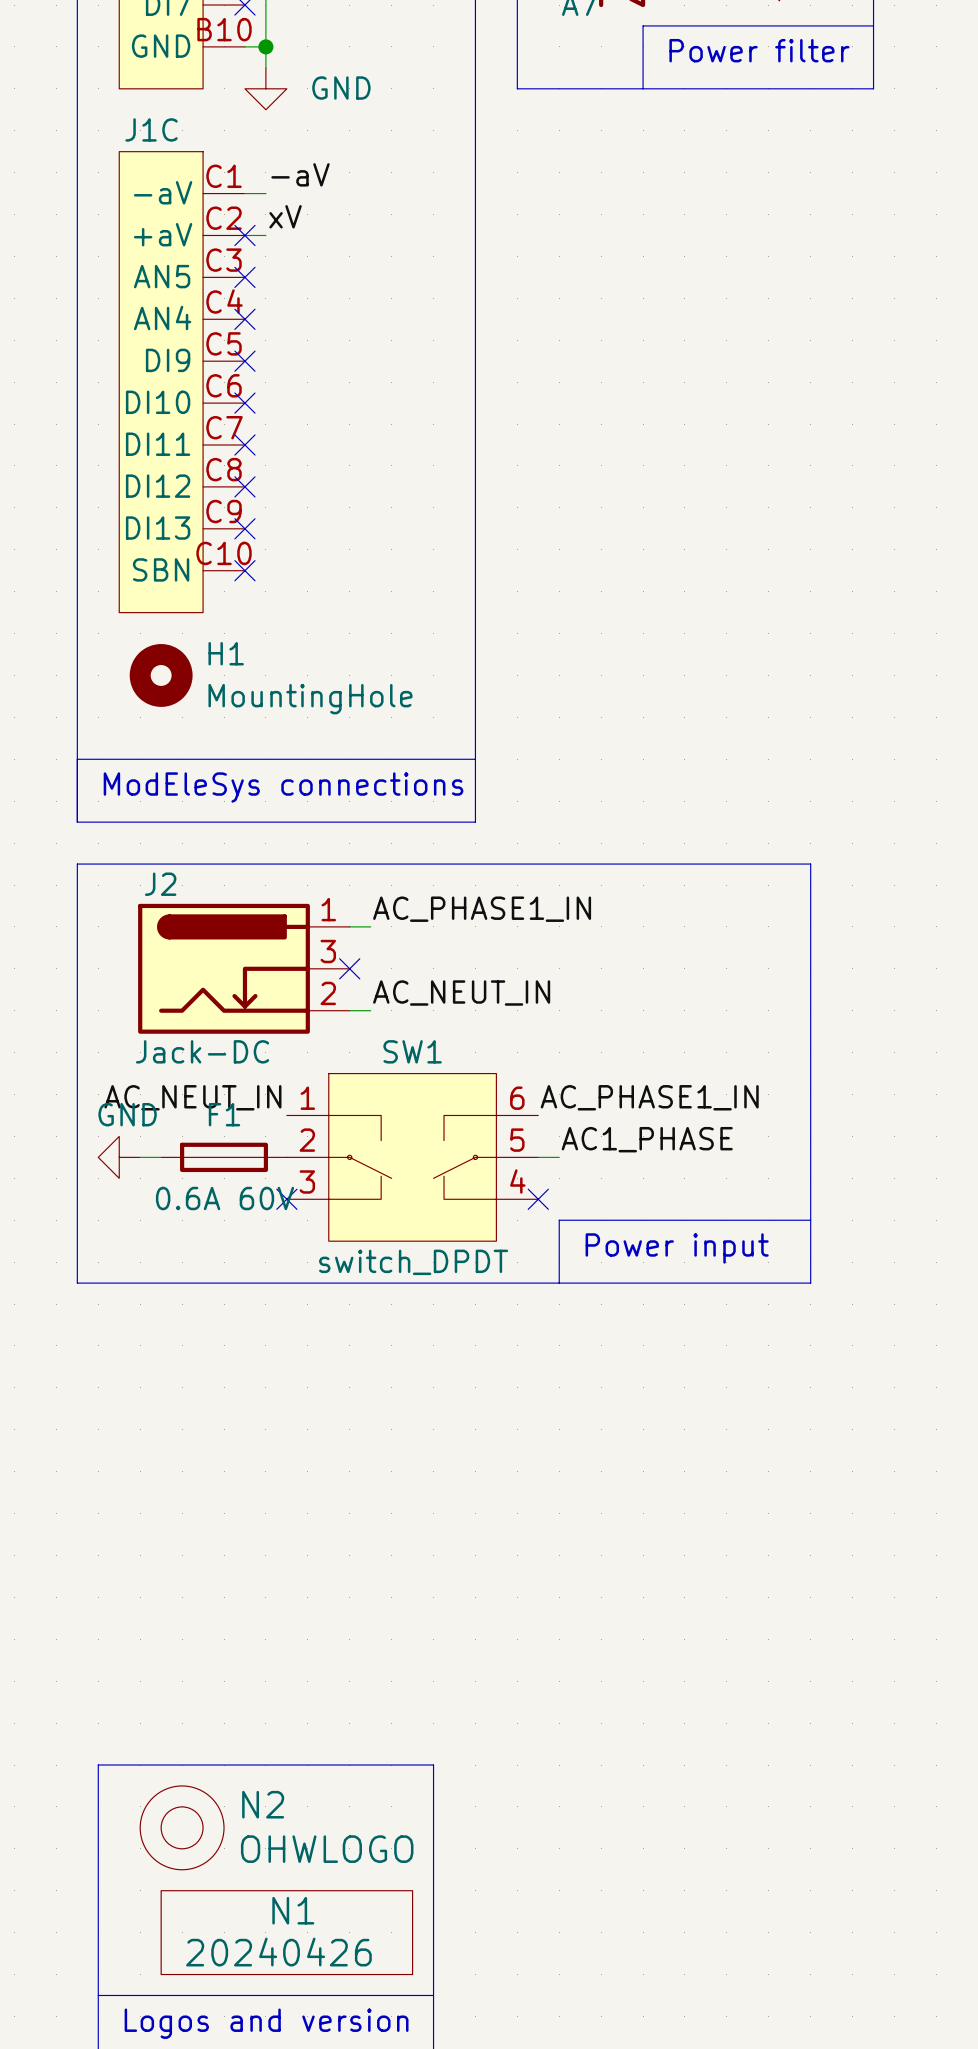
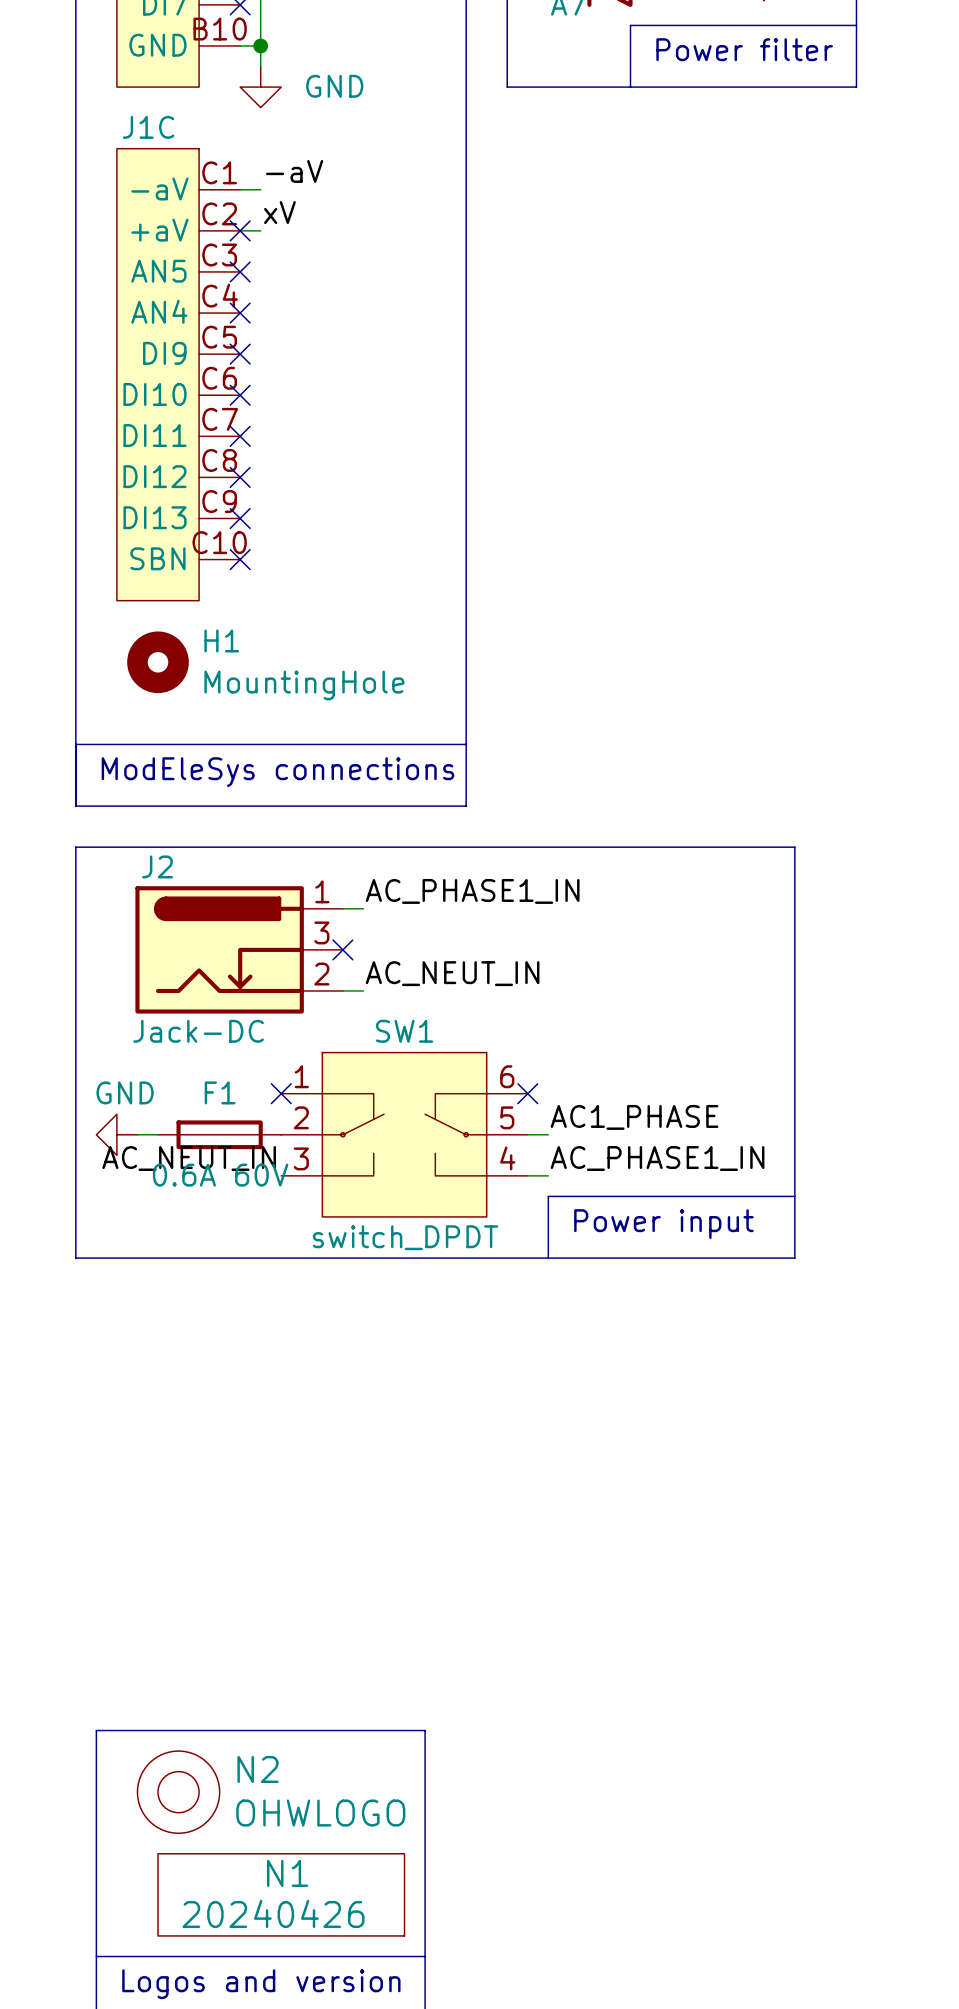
SW1 symbol: [286, 1073, 539, 1242] -> [281, 1052, 528, 1217]
label position: AC_NEUT_IN (192, 1097) -> AC_NEUT_IN (189, 1158)
label position: AC_PHASE1_IN (649, 1097) -> AC_PHASE1_IN (657, 1158)
no-connect mark position: (286, 1199) -> (281, 1093)
wire: none -> (527, 1175) (548, 1175)
no-connect mark position: (538, 1199) -> (527, 1093)

